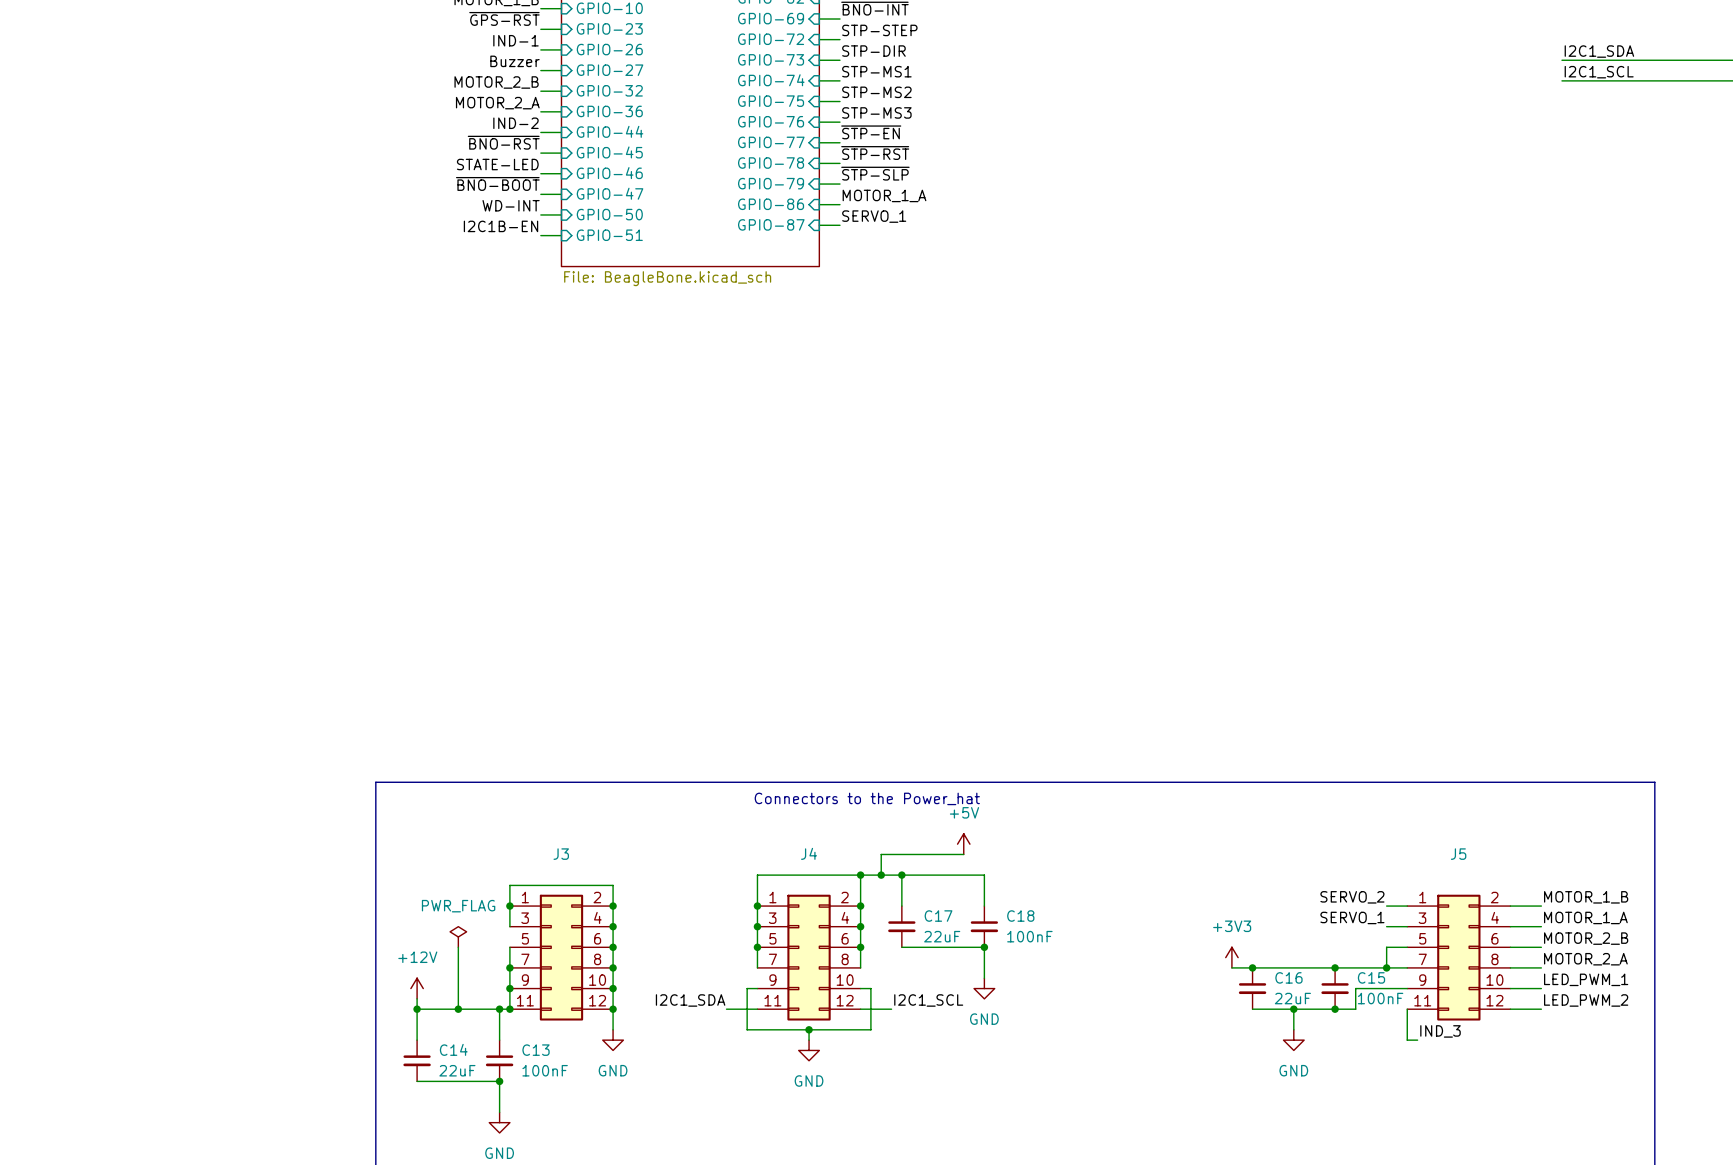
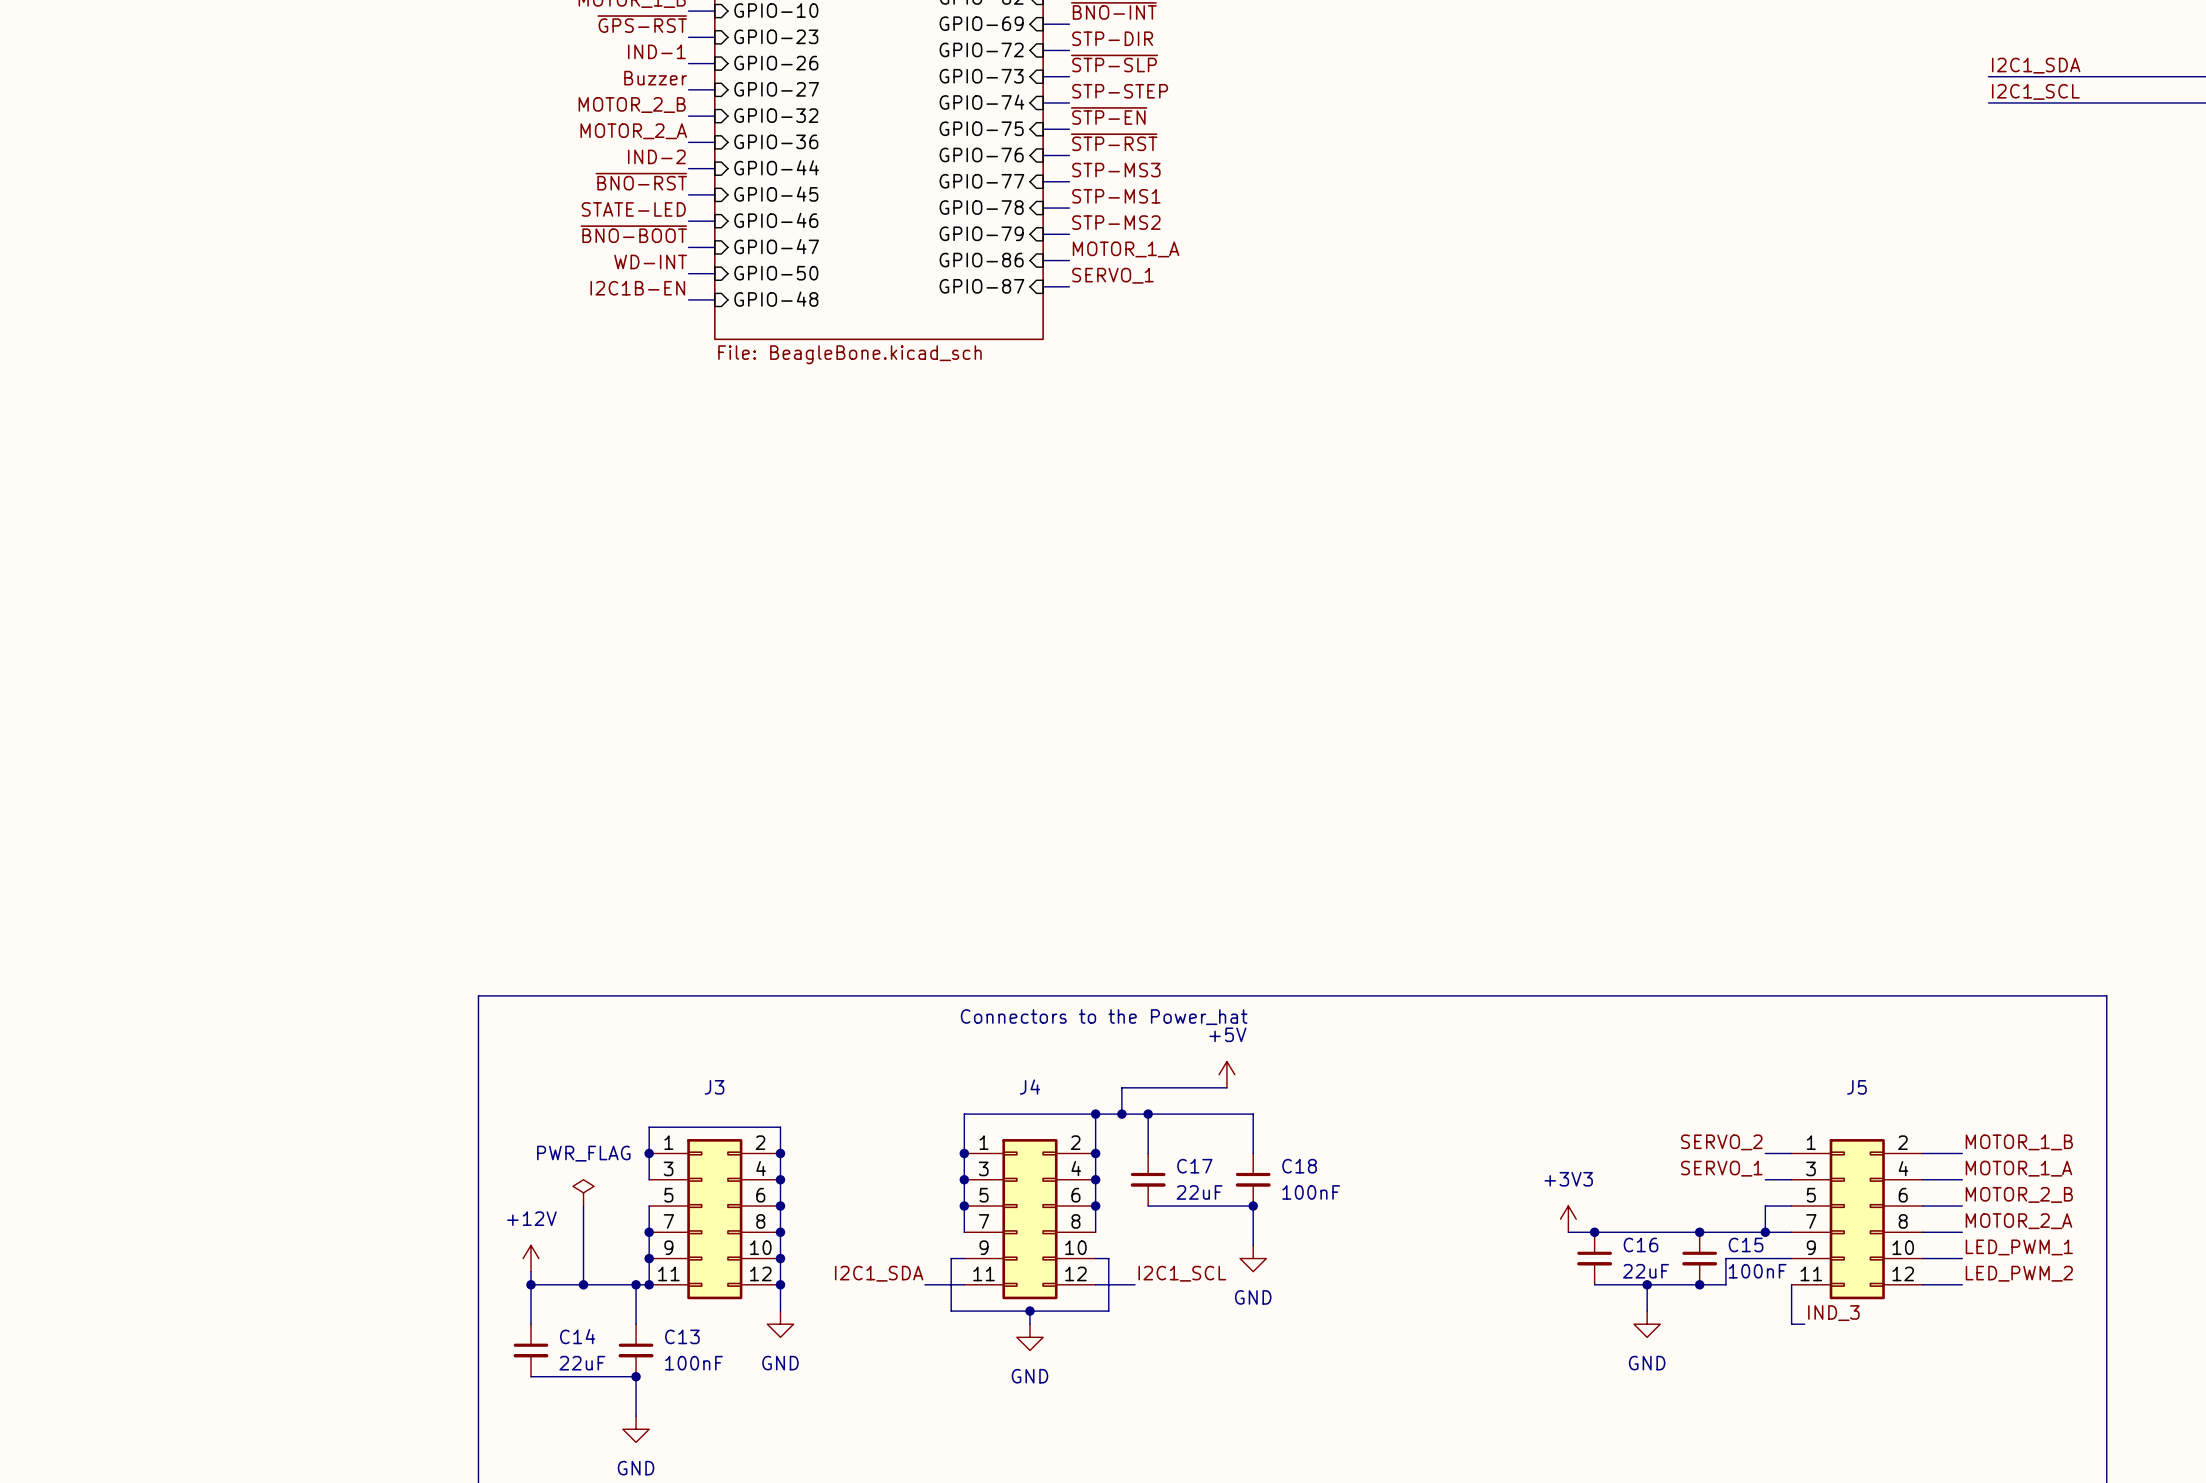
label: STP-STEP (879, 30) -> STP-DIR (1112, 38)
label: STP-DIR (873, 51) -> ~{STP-SLP} (1114, 63)
label: STP-MS1 (876, 71) -> STP-STEP (1120, 91)
label: STP-MS2 (876, 92) -> ~{STP-EN} (1109, 116)
label: STP-MS3 (876, 112) -> ~{STP-RST} (1114, 142)
label: ~{STP-EN} (871, 132) -> STP-MS3 (1116, 170)
label: ~{STP-RST} (875, 153) -> STP-MS1 (1116, 196)
label: ~{STP-SLP} (875, 173) -> STP-MS2 (1116, 222)
sheet pin: GPIO-51 (609, 235) -> GPIO-48 (776, 299)

